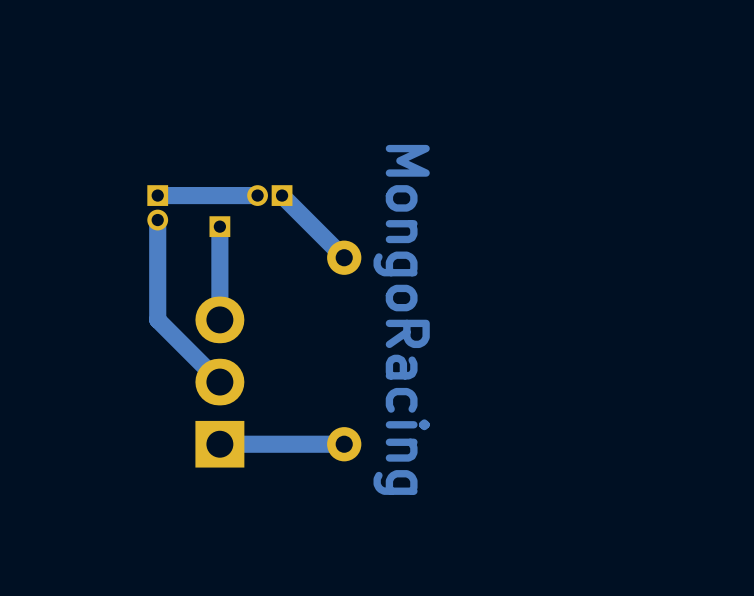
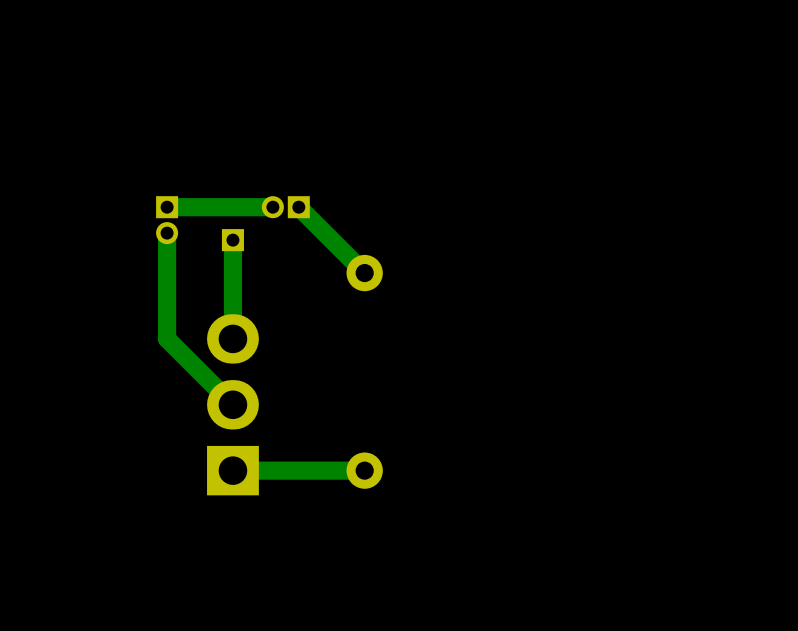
text: MongoRacing (401, 319) -> none

